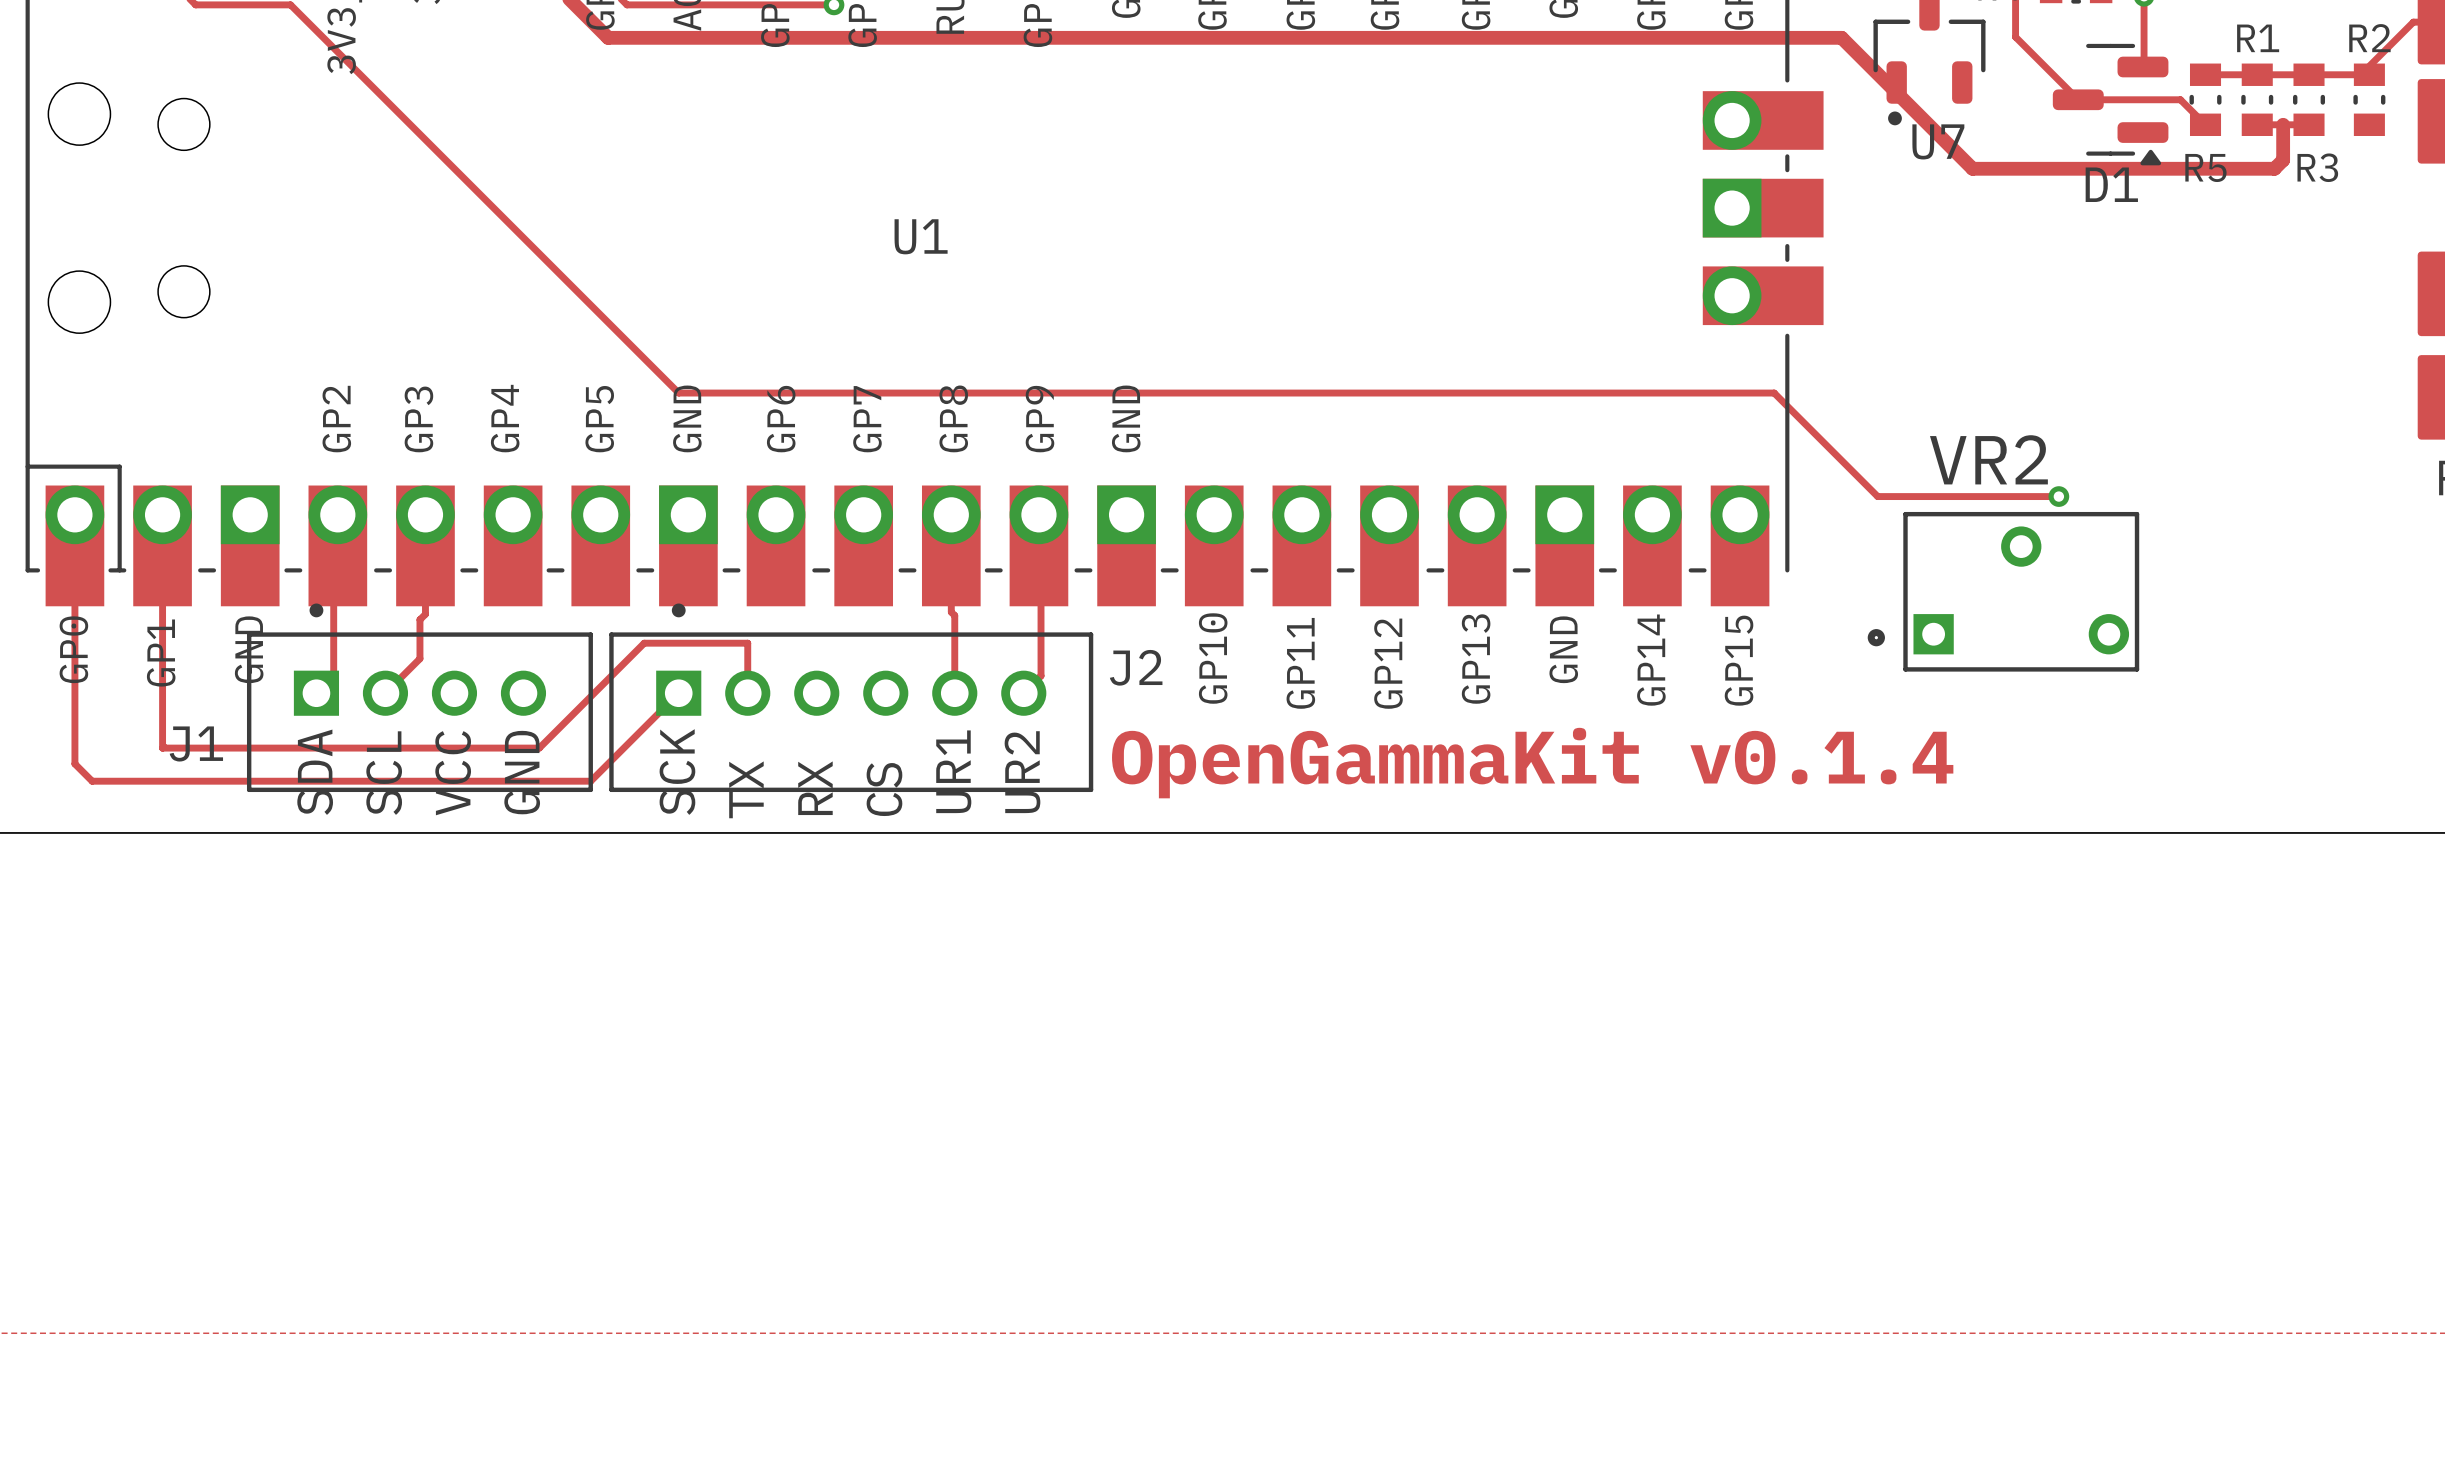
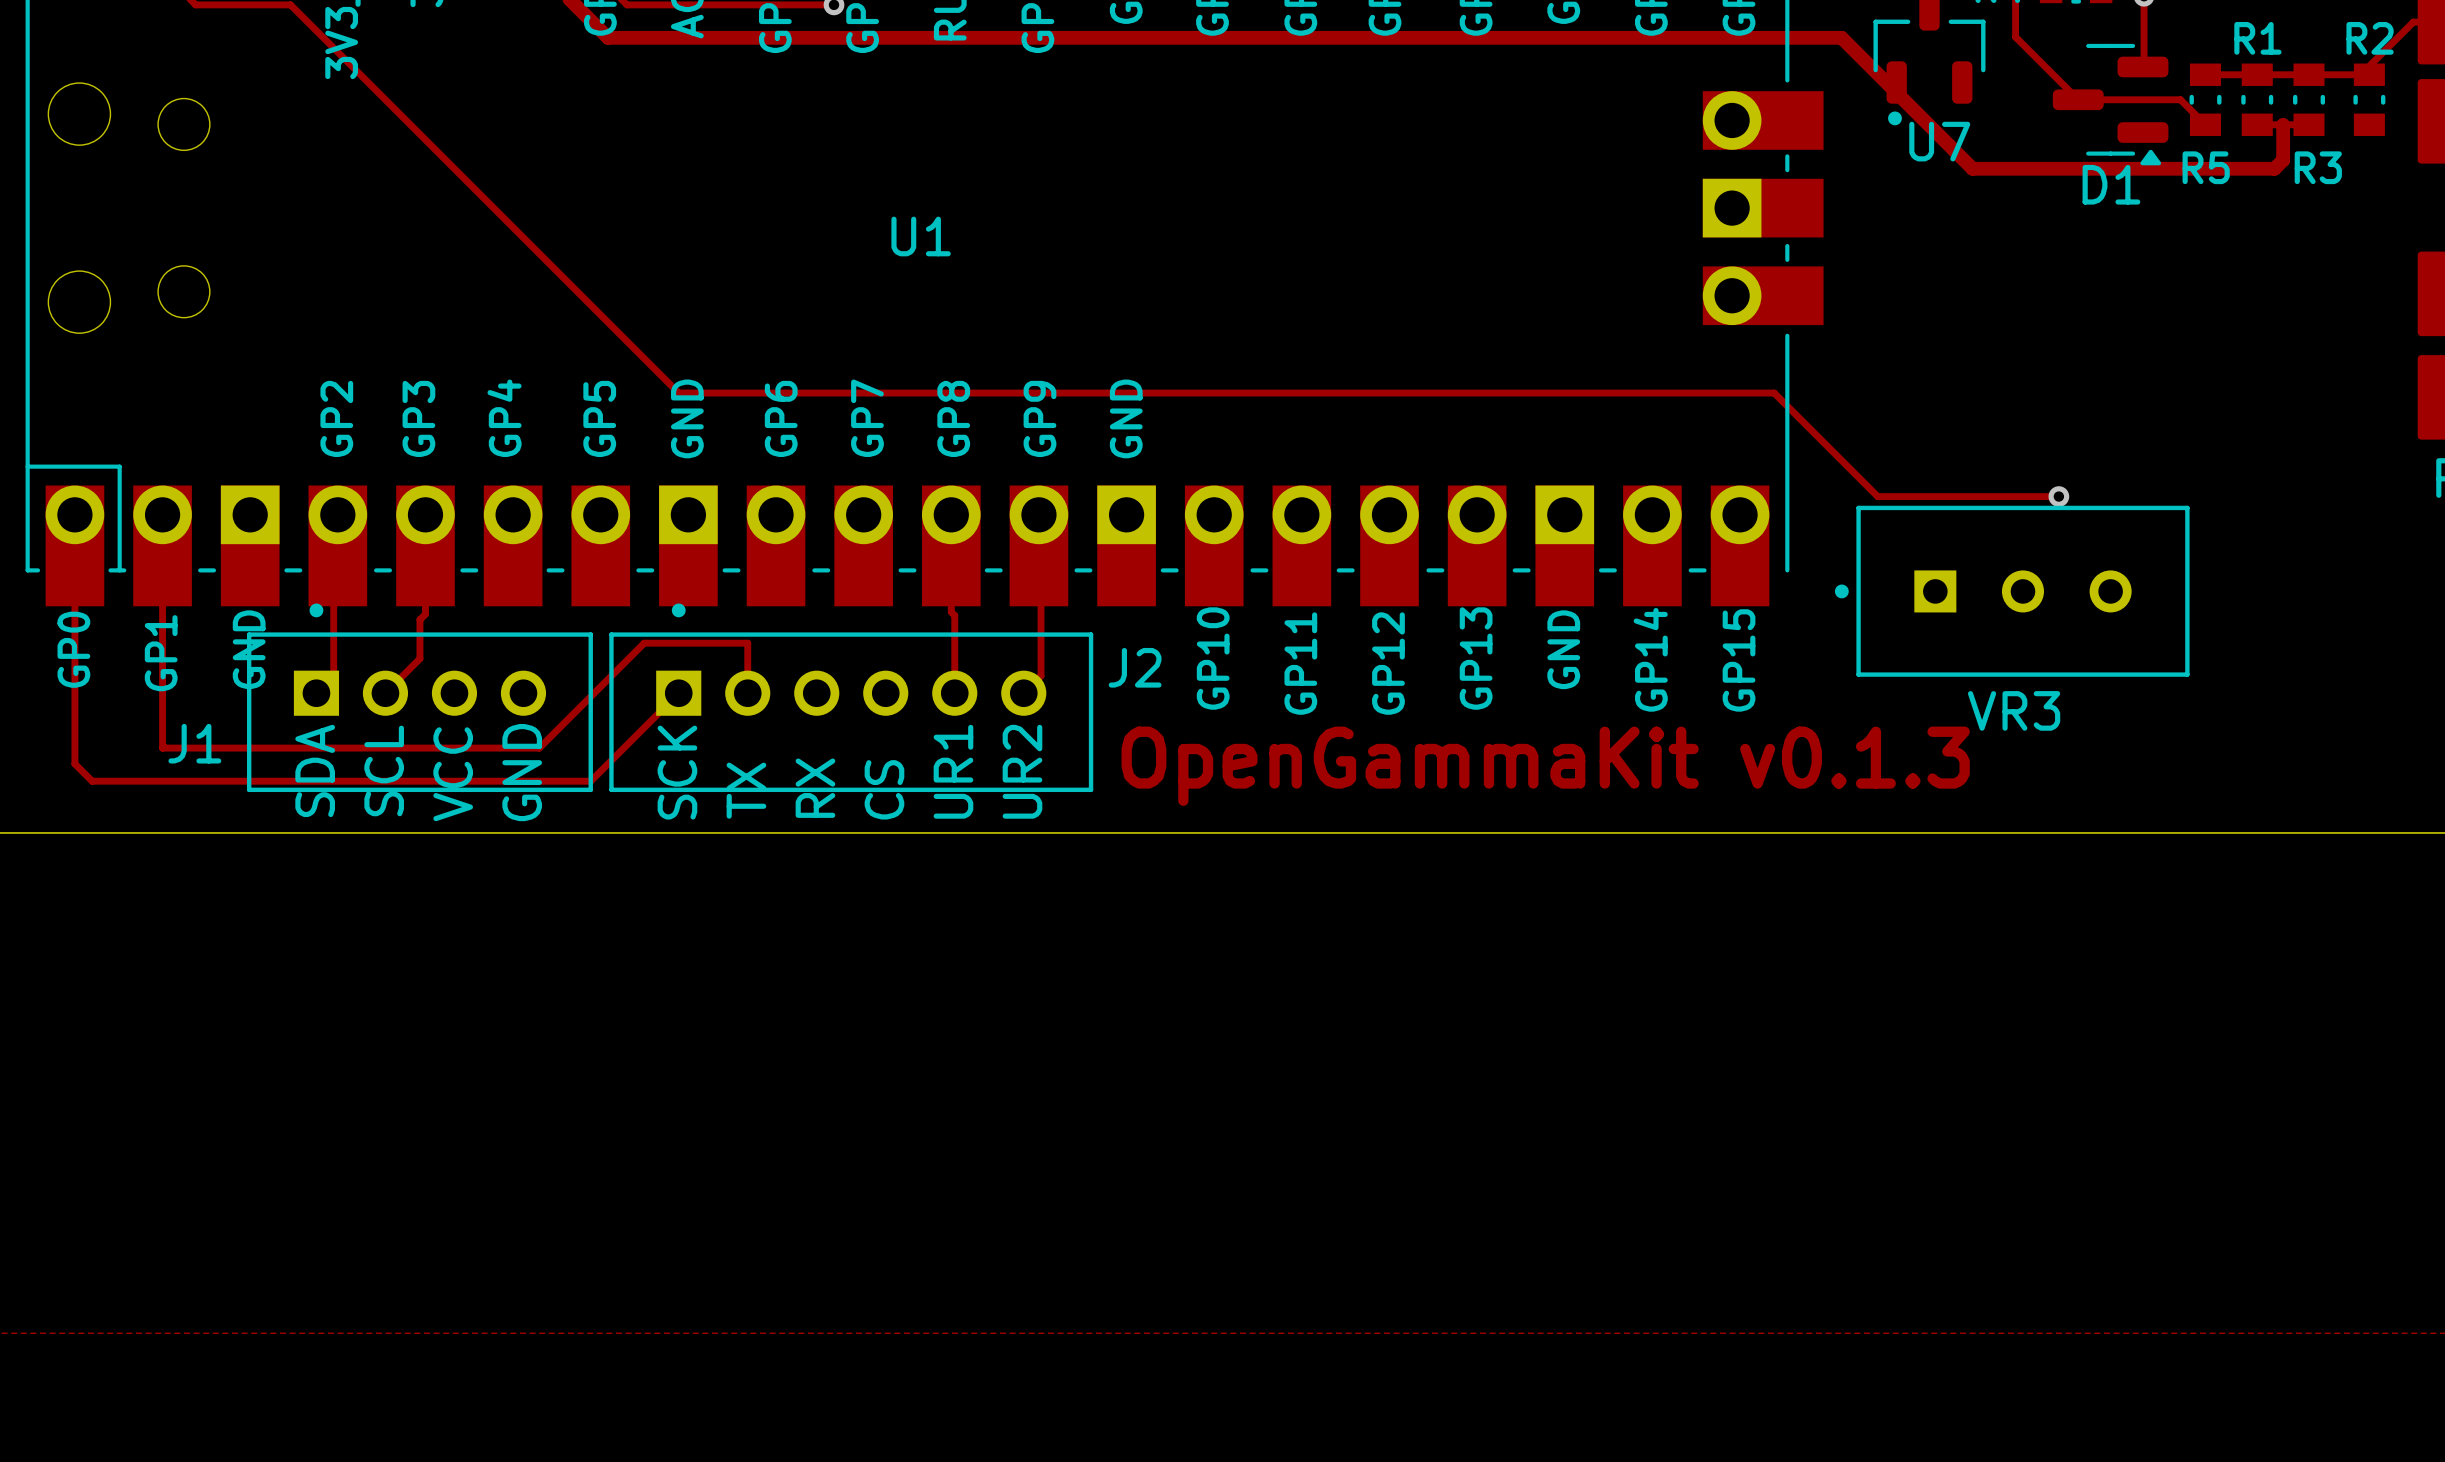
VR2: (2003, 591) -> none
VR3: none -> (2012, 591)
text: OpenGammaKit v0.1.4 (1532, 763) -> OpenGammaKit v0.1.3 (1545, 766)

